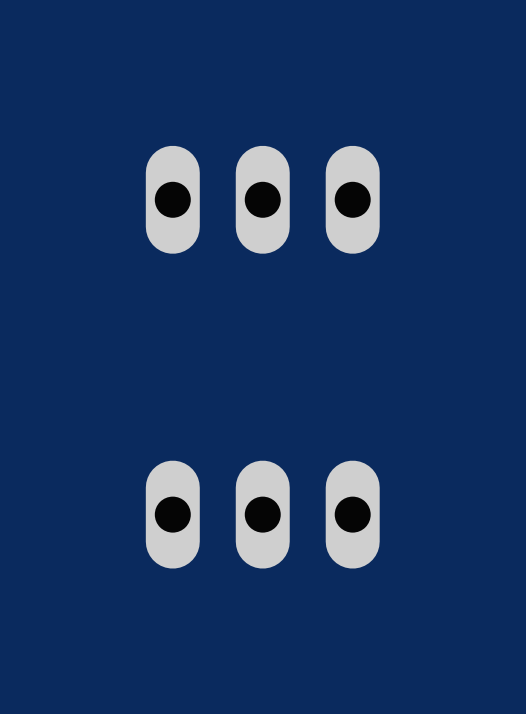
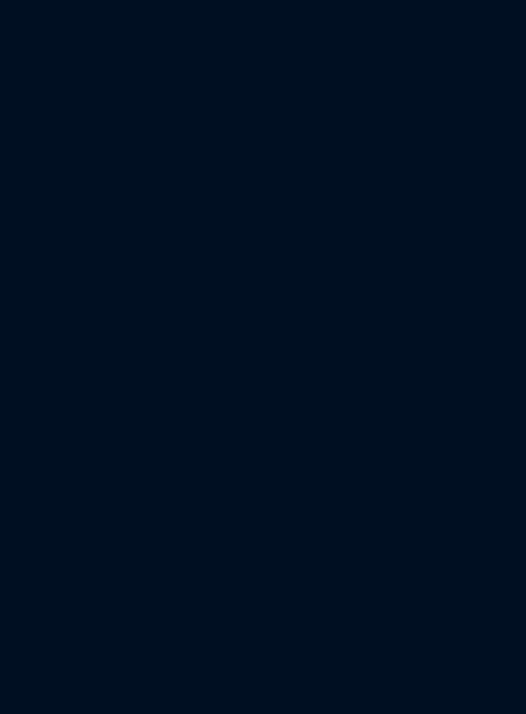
part: (262, 199) -> none
part: (262, 514) -> none

